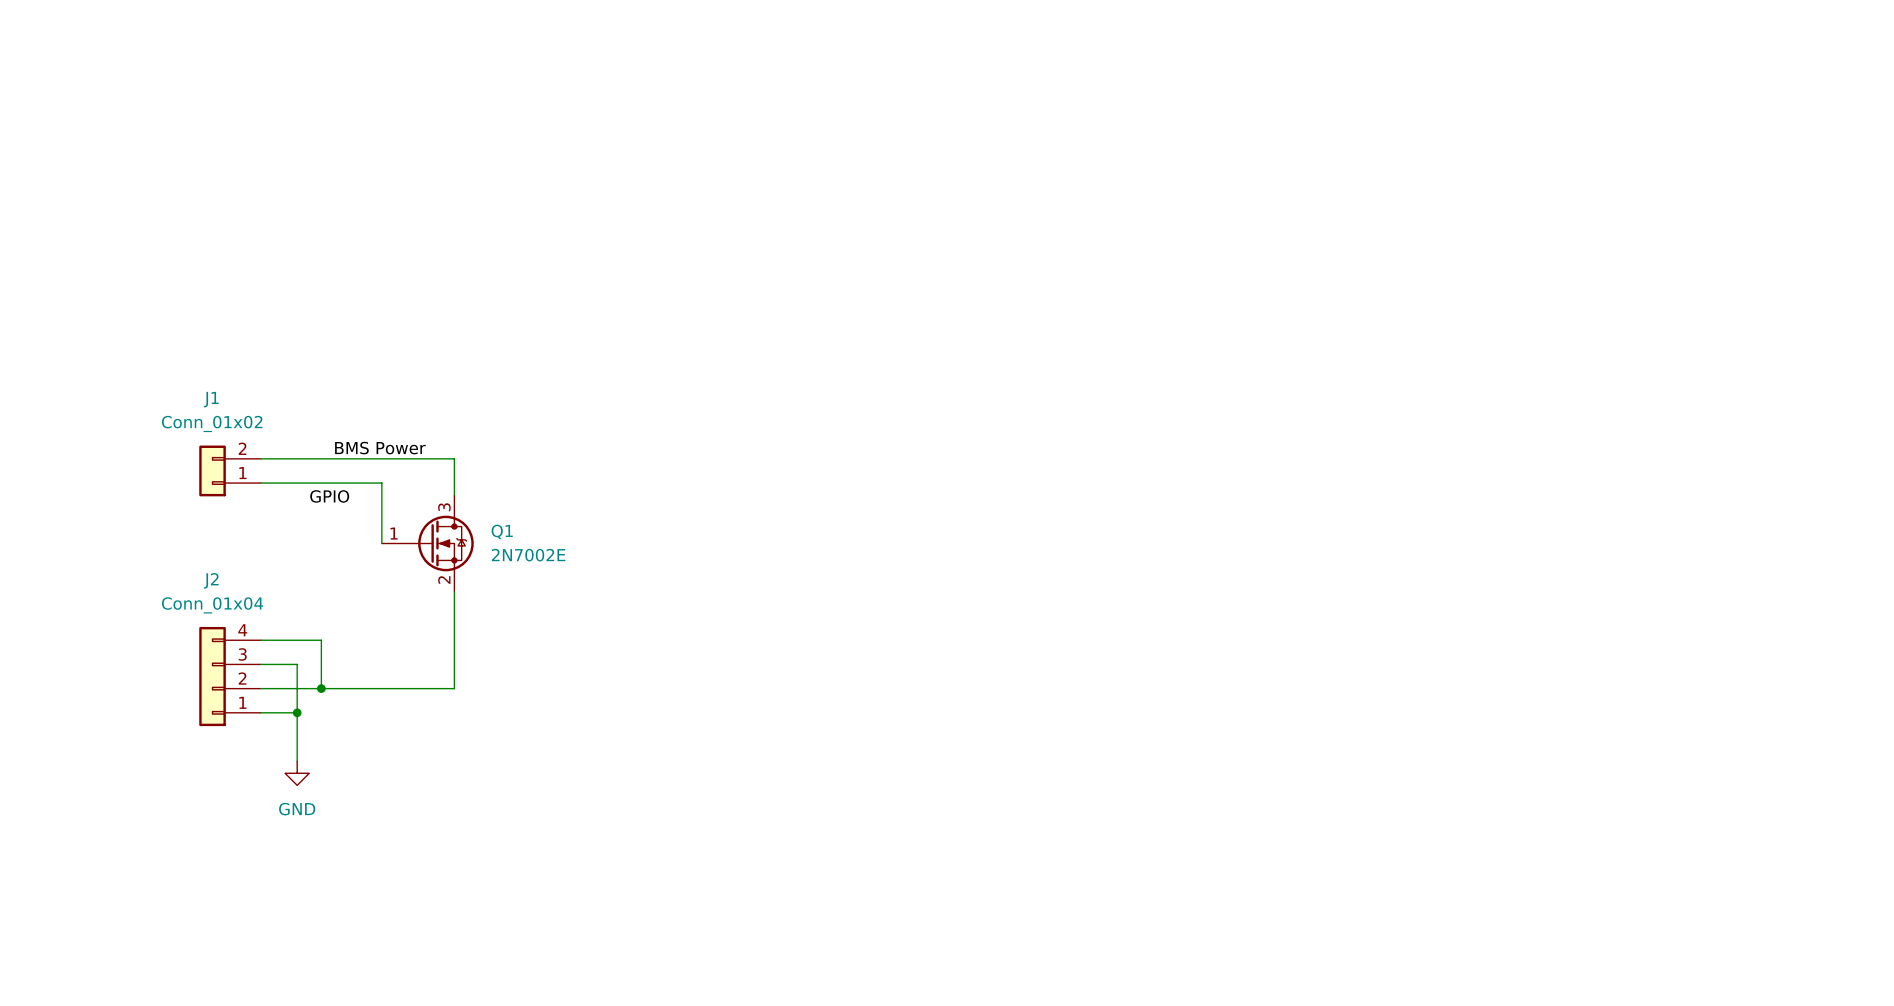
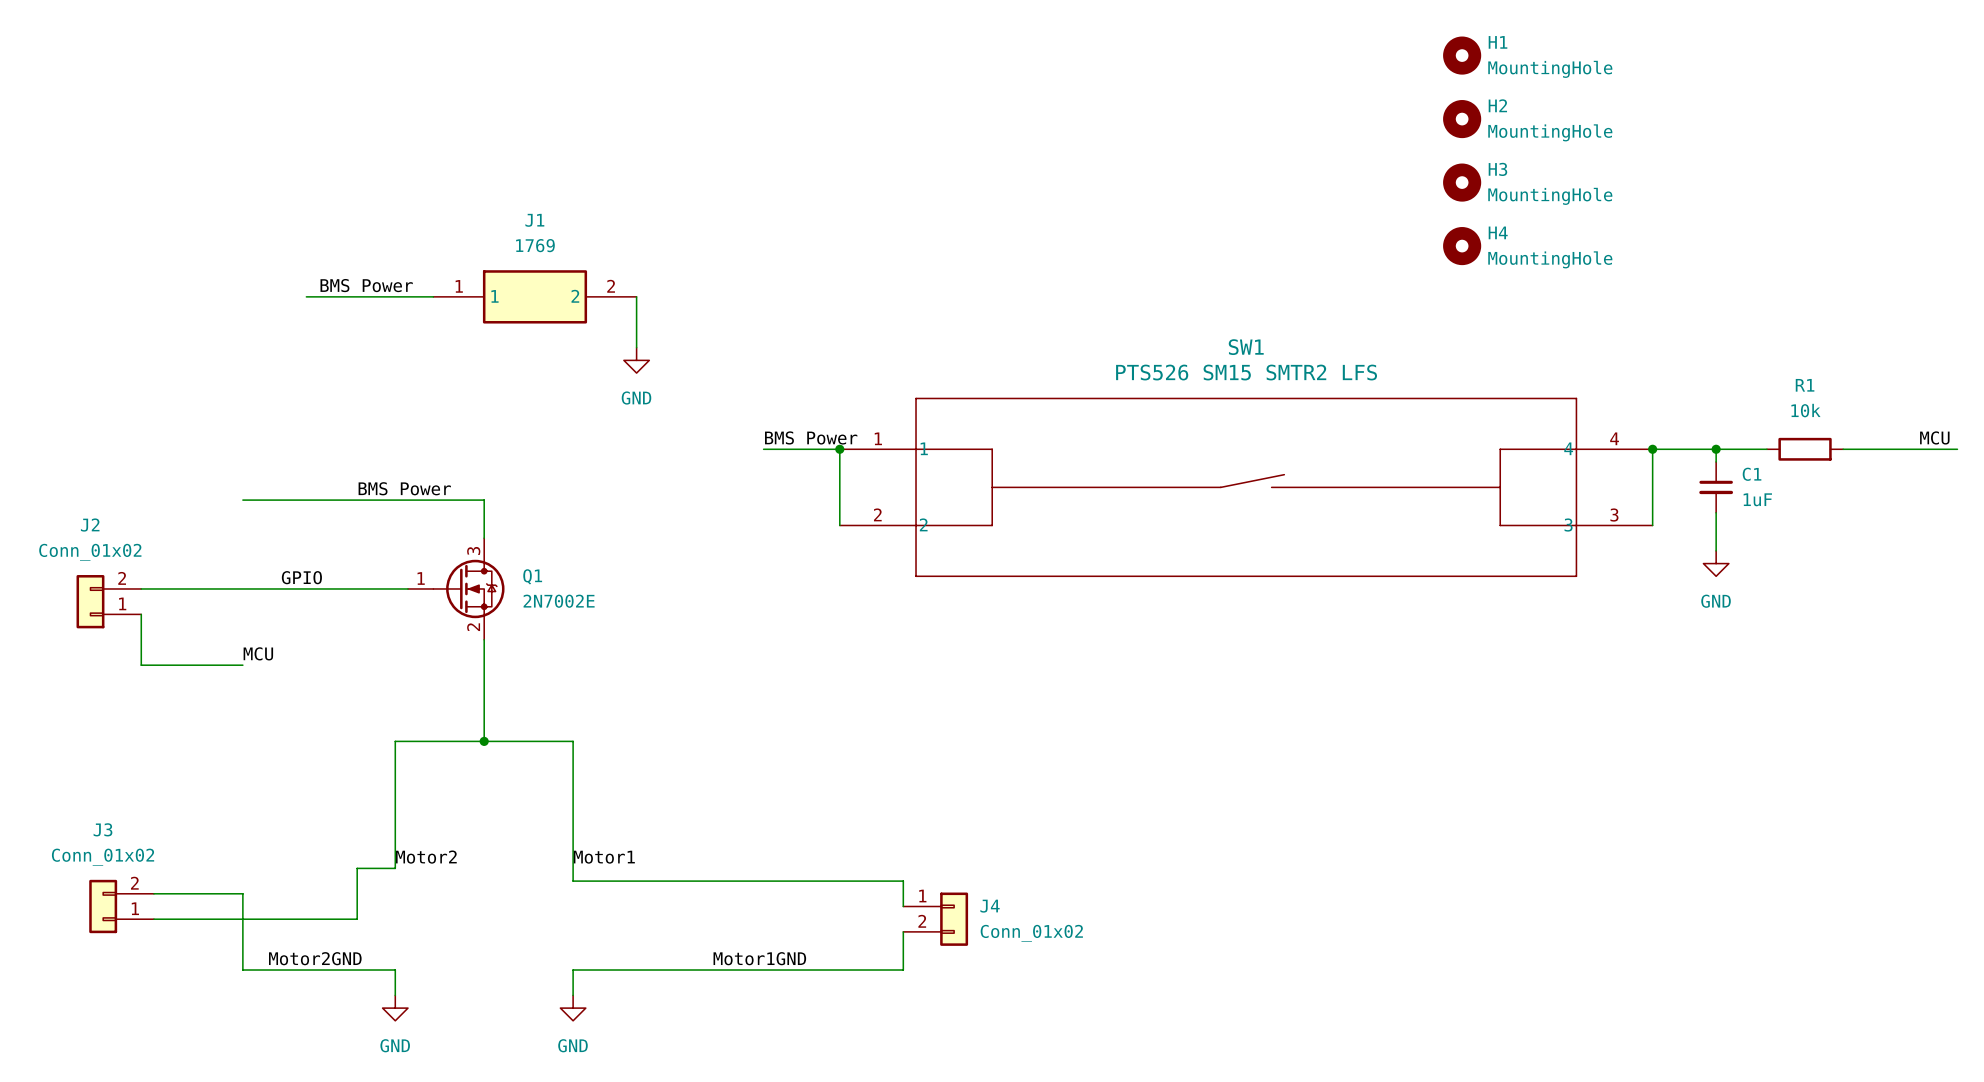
H1: none -> MountingHole (1462, 55)
H2: none -> MountingHole (1462, 119)
H3: none -> MountingHole (1462, 182)
H4: none -> MountingHole (1462, 246)
label: none -> BMS Power (366, 285)
wire: none -> (306, 296) (433, 296)
wire: none -> (636, 296) (636, 347)
power symbol: none -> GND (636, 360)
label: none -> BMS Power (811, 437)
label: none -> MCU (1934, 437)
wire: none -> (763, 449) (839, 449) (839, 525)
junction: none -> (839, 449)
junction: none -> (1652, 449)
wire: none -> (1716, 449) (1716, 461)
junction: none -> (1716, 449)
wire: none -> (1766, 449) (1652, 449) (1652, 525)
R1: none -> 10k (1805, 449)
wire: none -> (1843, 449) (1957, 449)
J1 value: Conn_01x02 (212, 423) -> 1769 (535, 245)
J1 symbol: [199, 445, 261, 497] -> [433, 270, 637, 324]
SW1: none -> PTS526 SM15 SMTR2 LFS (1246, 487)
C1: none -> 1uF (1716, 487)
wire: none -> (1716, 512) (1716, 550)
wire: (260, 483) (381, 483) (381, 543) -> (141, 588) (407, 588)
label position: GPIO (329, 496) -> GPIO (301, 577)
power symbol: none -> GND (1716, 563)
wire: none -> (141, 614) (141, 665) (242, 665)
J2 name position: J2 (211, 580) -> J2 (90, 525)
J2 value: Conn_01x04 (212, 605) -> Conn_01x02 (90, 552)
label: none -> MCU (258, 653)
J2 symbol: [199, 626, 261, 727] -> [76, 575, 142, 629]
wire: (260, 640) (321, 640) (321, 688) -> none
wire: (260, 664) (297, 664) (297, 761) -> none
wire: (260, 688) (369, 688) -> (153, 919) (357, 919) (357, 868) (395, 868) (395, 741)
junction: (321, 688) -> none
wire: none -> (484, 741) (573, 741) (573, 881) (903, 881) (903, 906)
junction: none -> (484, 741)
wire: (260, 712) (297, 712) -> none
junction: (297, 712) -> none
power symbol: GND (297, 773) -> none
label: none -> Motor2 (426, 857)
label: none -> Motor1 (604, 857)
wire: none -> (153, 893) (242, 893) (242, 970) (395, 970) (395, 995)
J3: none -> Conn_01x02 (121, 906)
J4: none -> Conn_01x02 (935, 919)
wire: none -> (903, 931) (903, 970) (573, 970) (573, 995)
label: none -> Motor2GND (315, 958)
label: none -> Motor1GND (759, 958)
power symbol: none -> GND (395, 1008)
power symbol: none -> GND (573, 1008)

